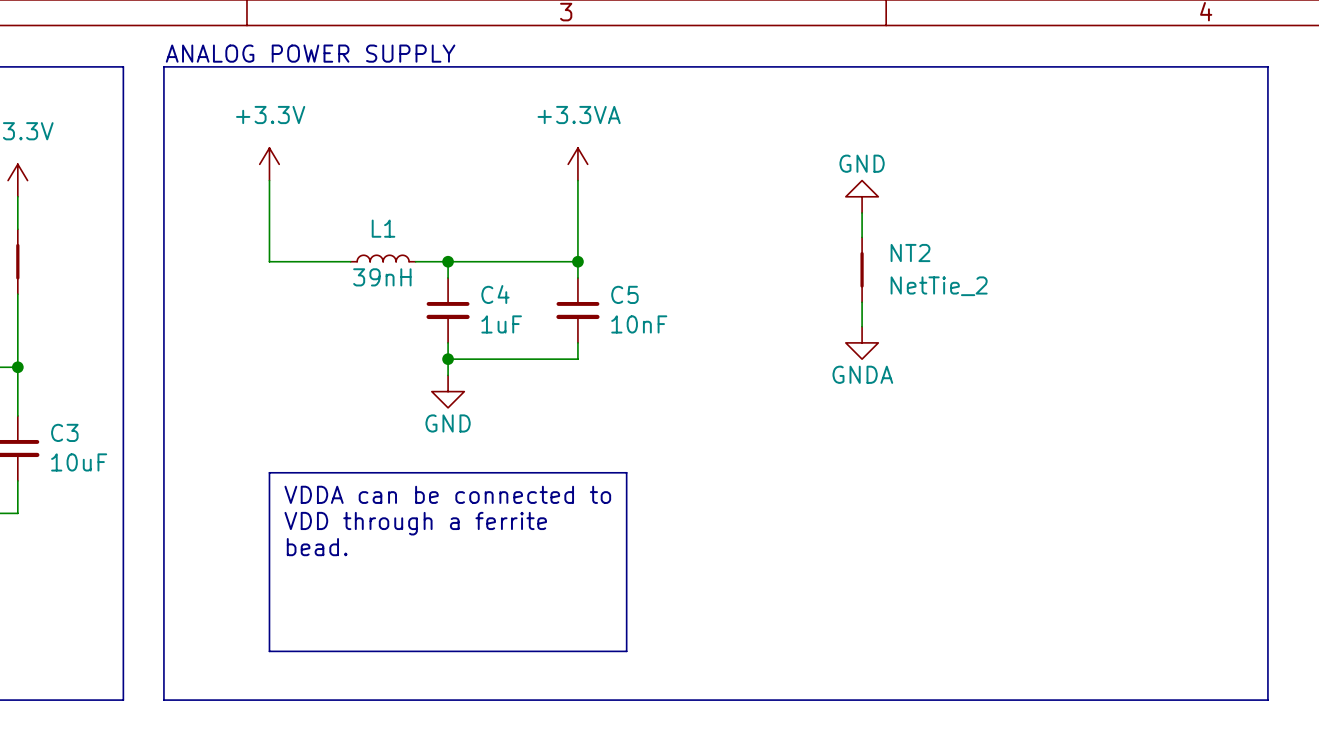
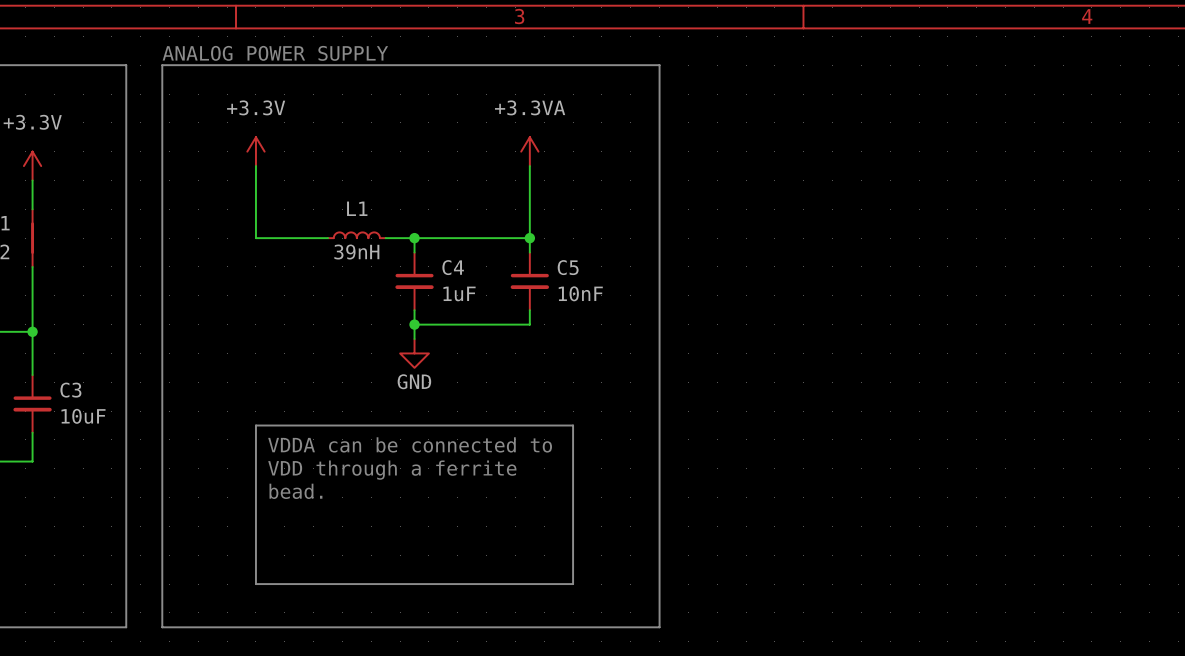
line: (724, 66) (1267, 66) (1267, 700) (724, 700) -> (659, 65) (659, 627)
power symbol: GND (862, 196) -> none
wire: (862, 213) (862, 237) -> none
NT2: NetTie_2 (862, 269) -> none
wire: (862, 302) (862, 326) -> none
power symbol: GNDA (862, 342) -> none

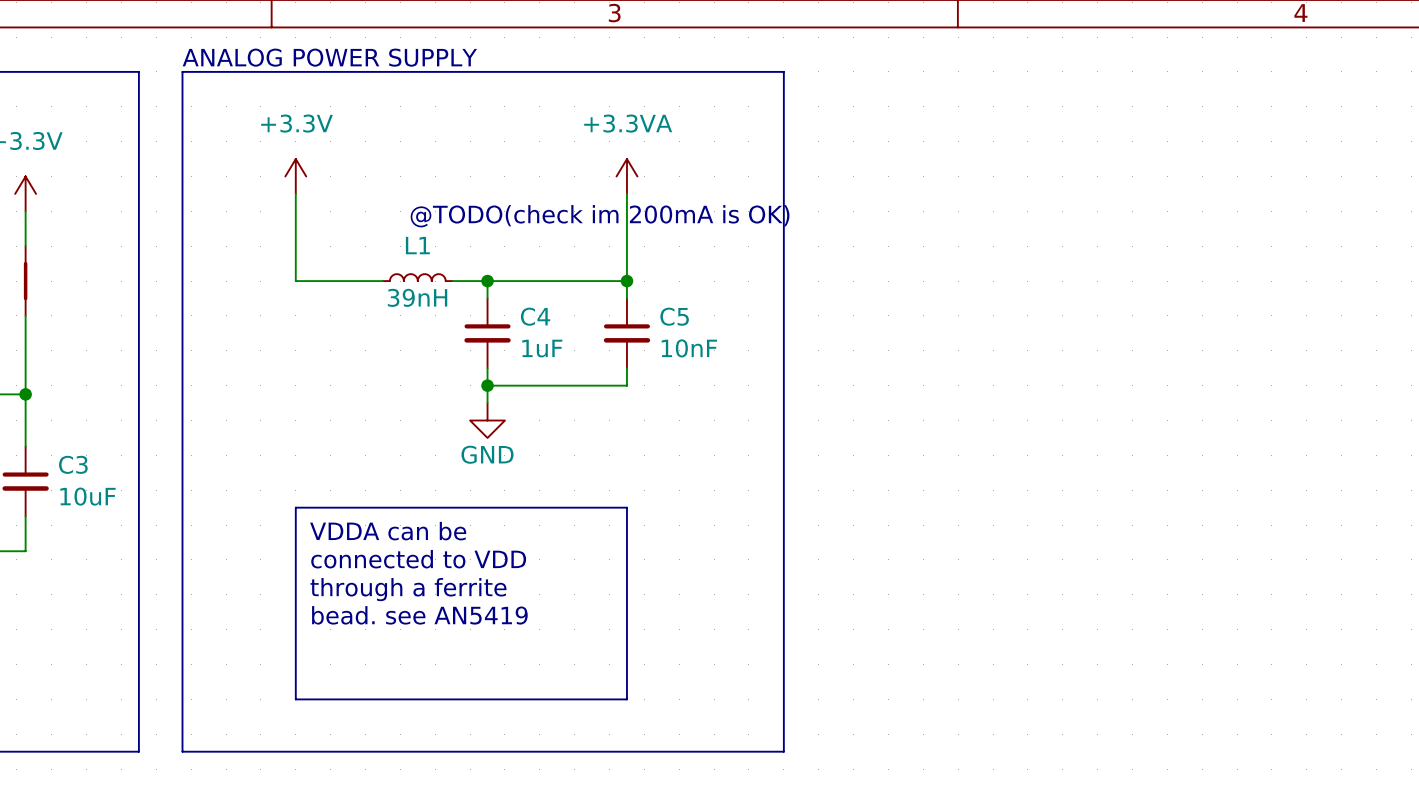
text: none -> @TODO(check im 200mA is OK) (600, 216)
line: (529, 425) (573, 425) (573, 584) (529, 584) -> (626, 507) (626, 699)
text: VDDA can be connected to (410, 444) -> VDDA can be (388, 531)
text: VDD through a ferrite (392, 470) -> connected to VDD (418, 559)
text: bead. (295, 491) -> through a ferrite (408, 589)
text: none -> bead. see AN5419 (419, 615)

